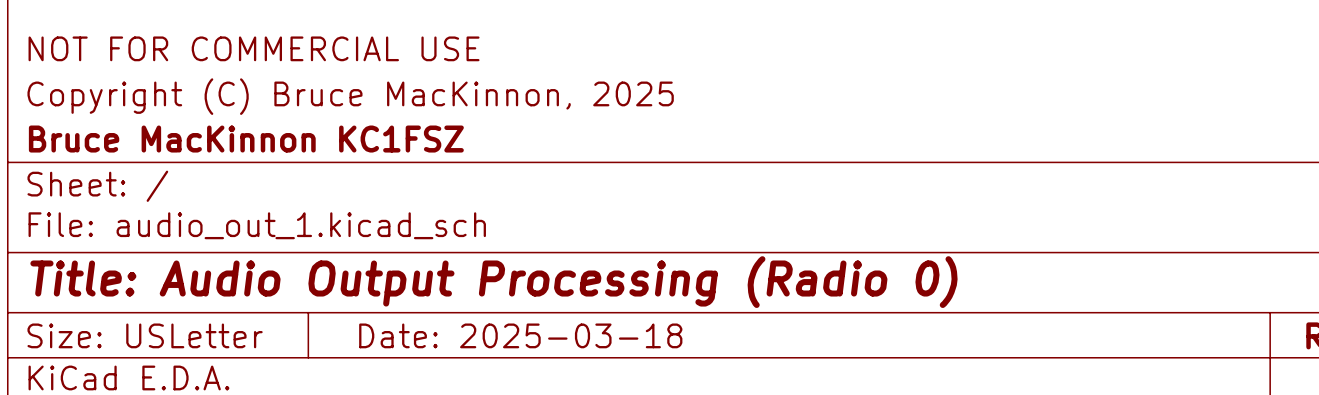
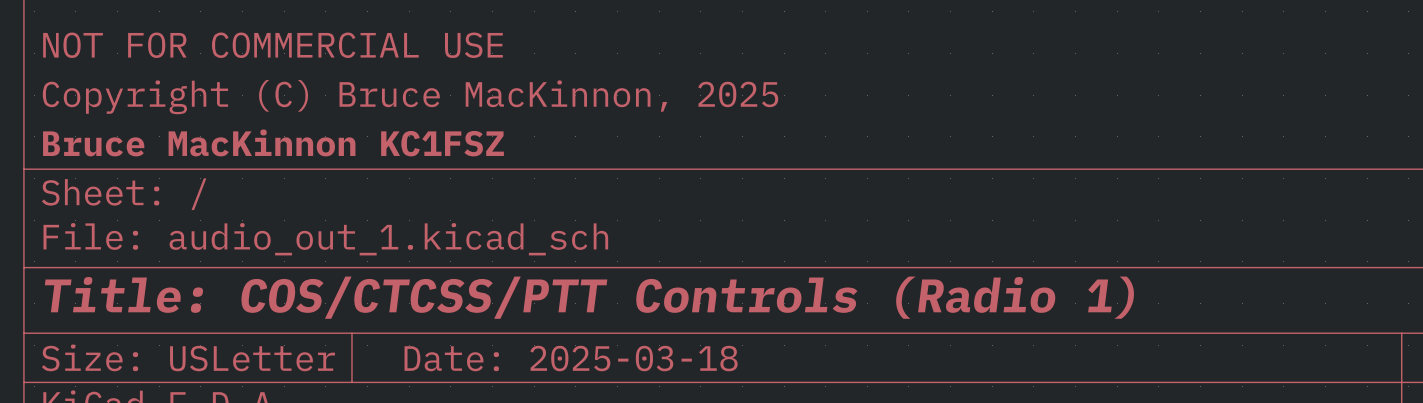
title block: Title: Audio Output Processing (Radio 0) (493, 282) -> Title: COS/CTCSS/PTT Controls (Radio 1) (589, 297)

